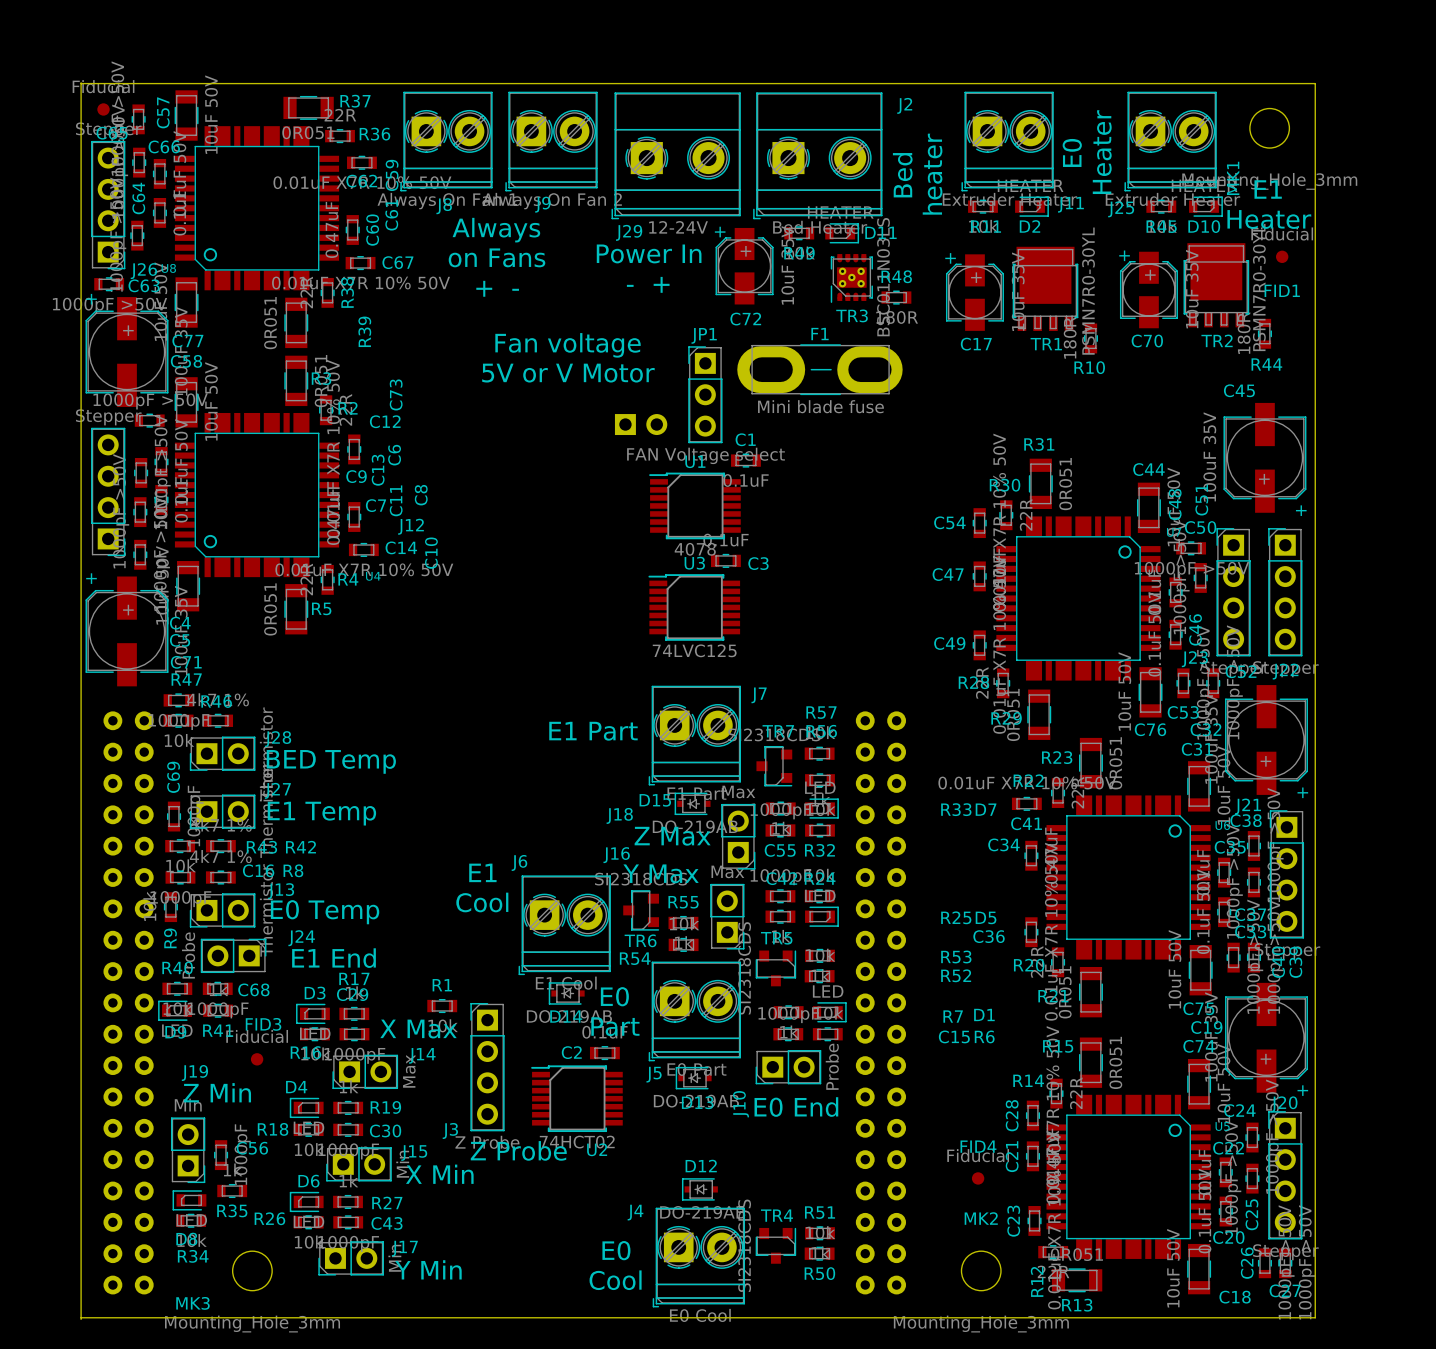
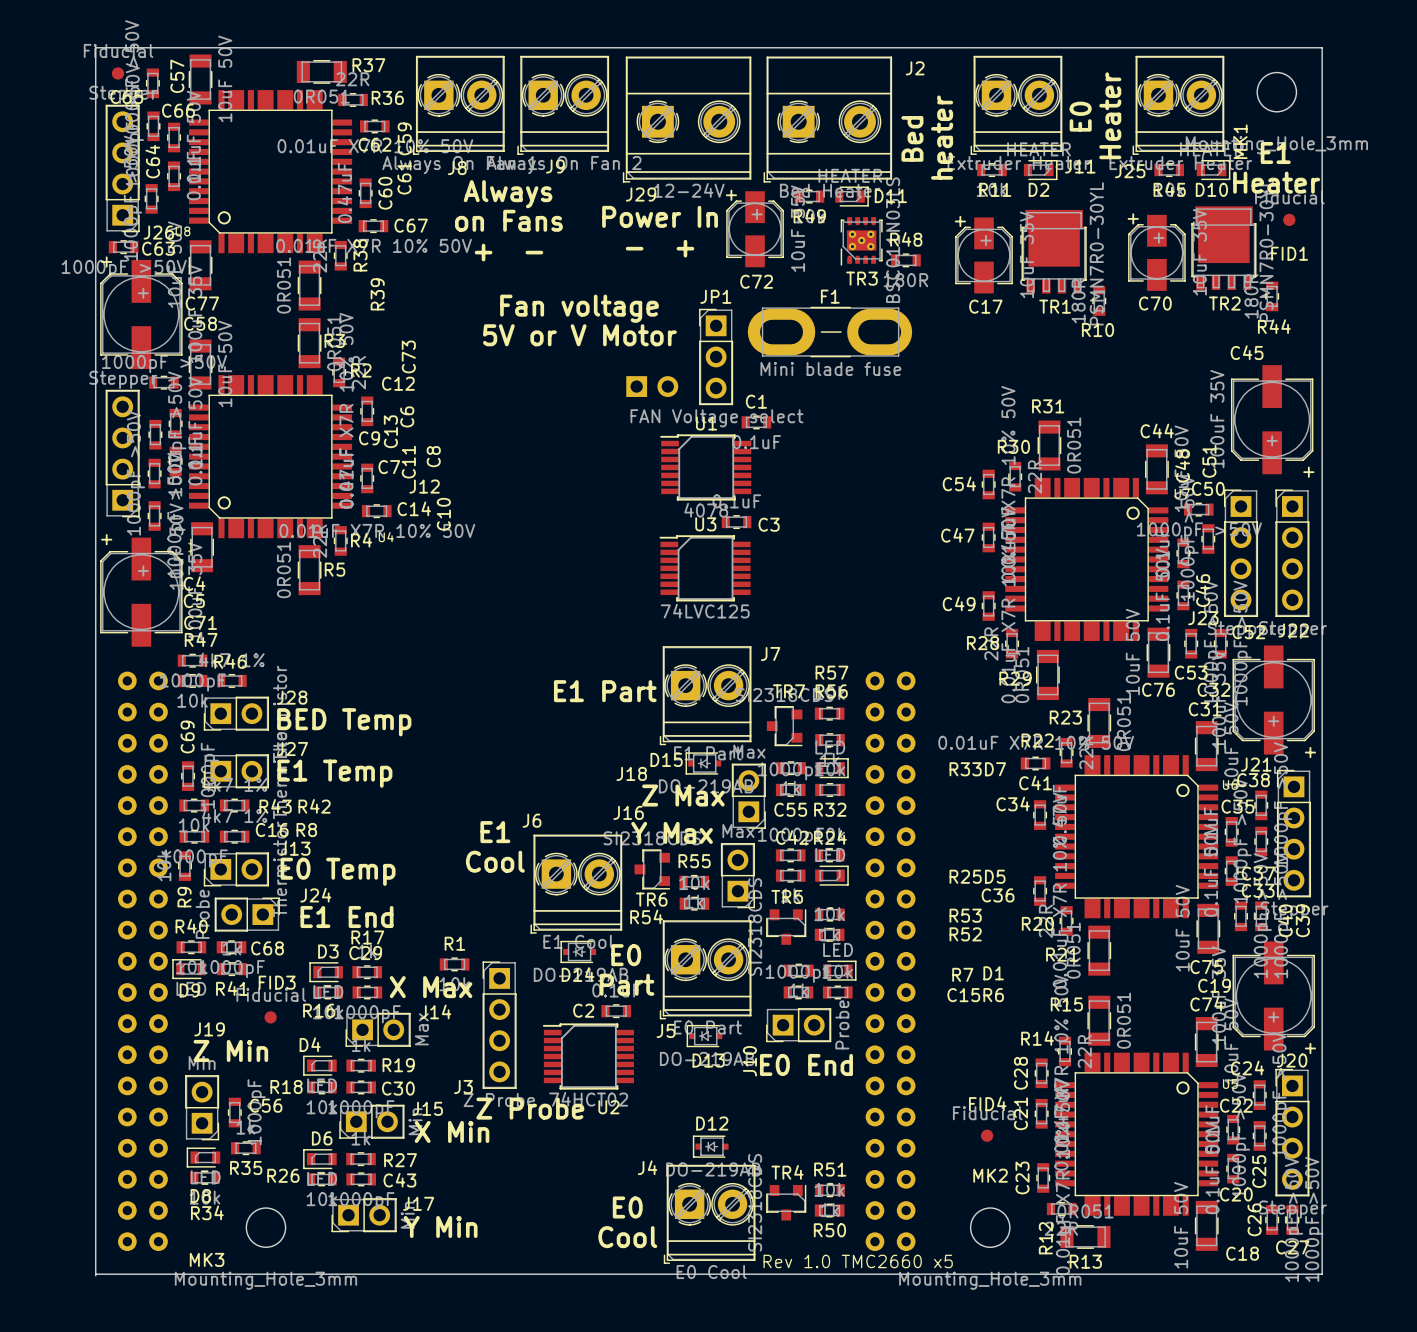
text: none -> Rev 1.0 TMC2660 x5 (858, 1261)

